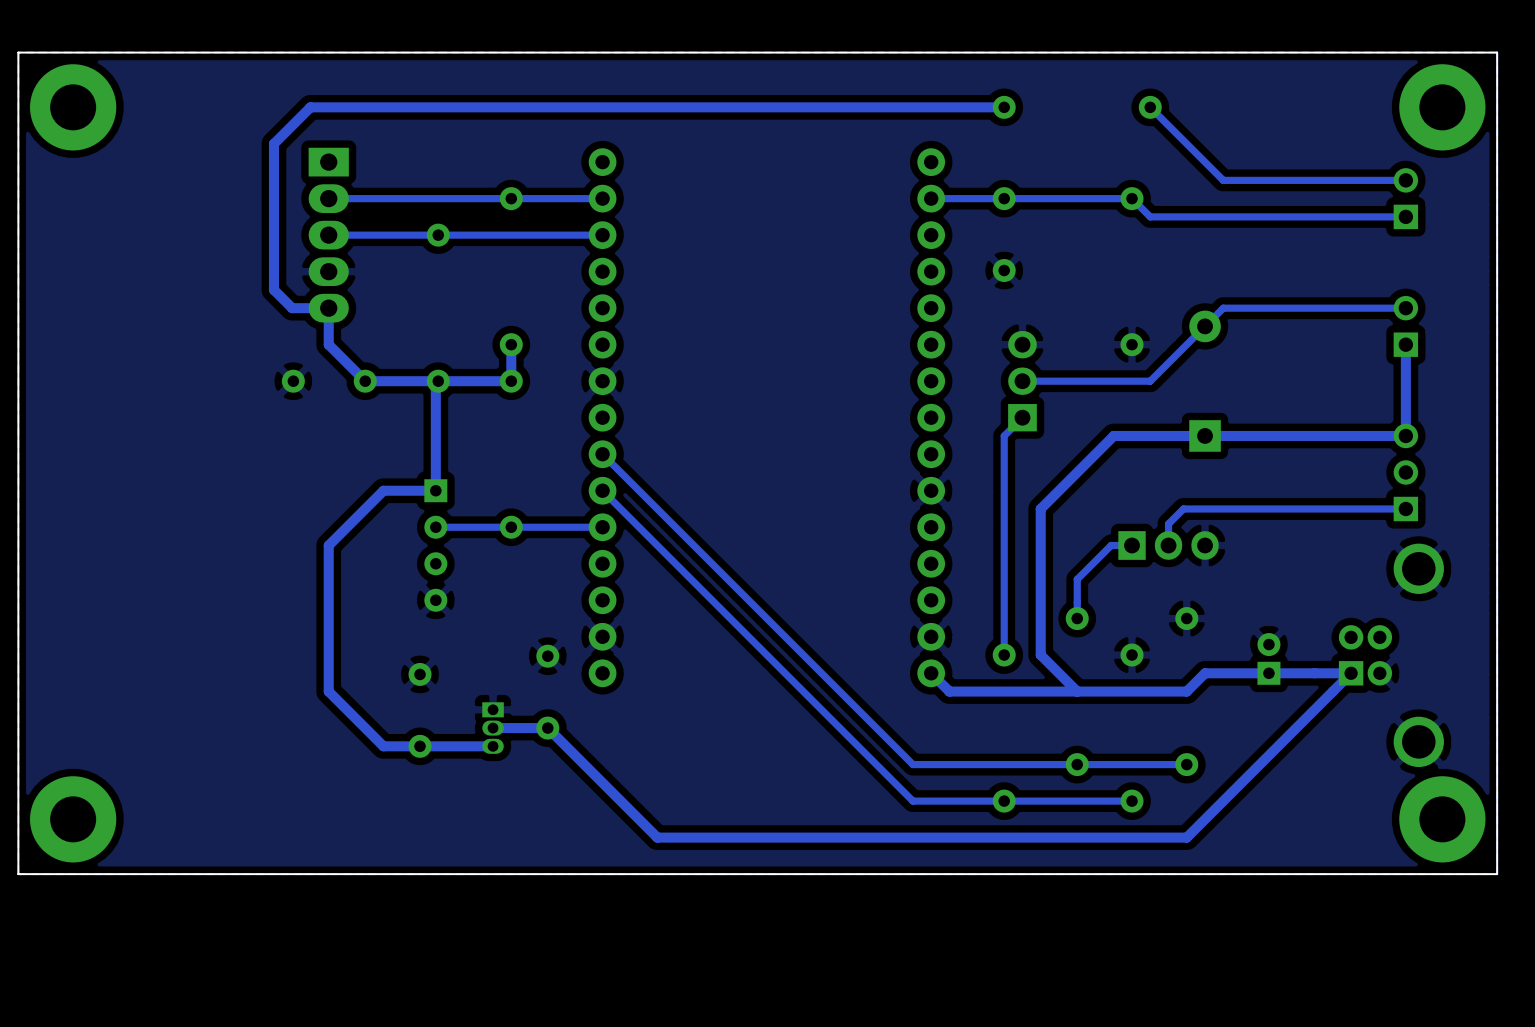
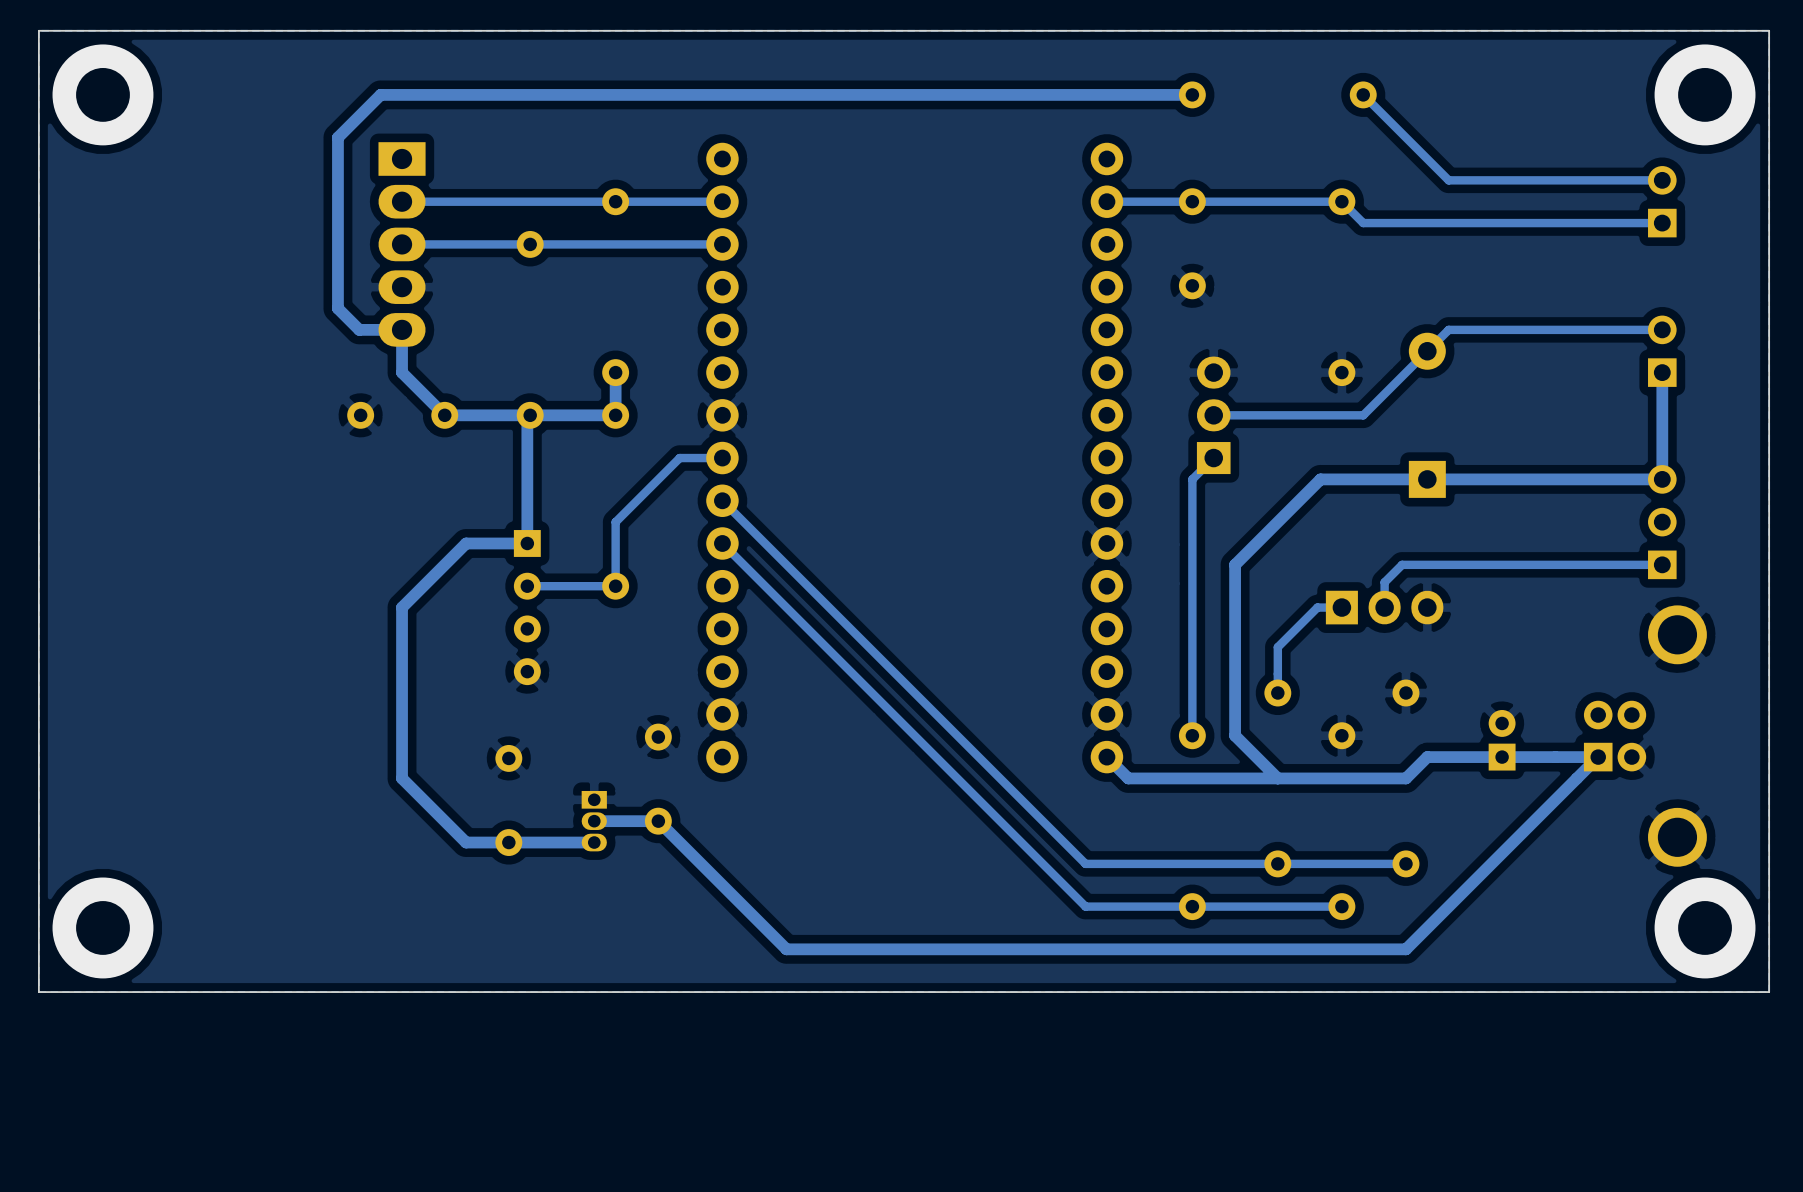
track: (602, 527) (511, 527) -> (722, 458) (679, 458) (615, 522) (615, 586)

